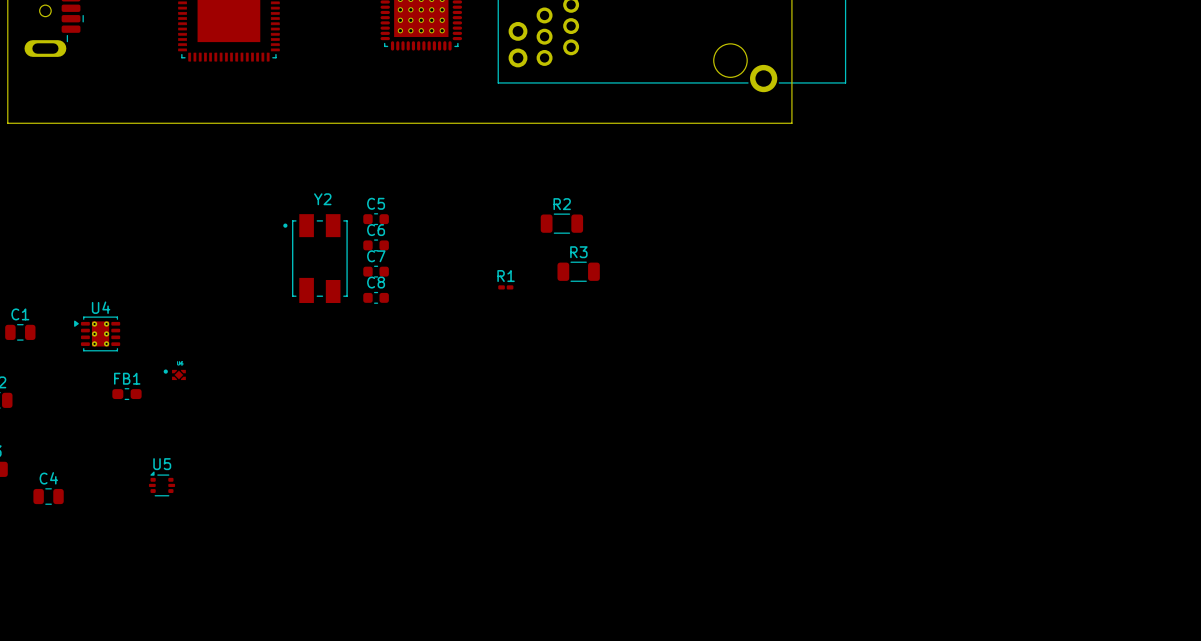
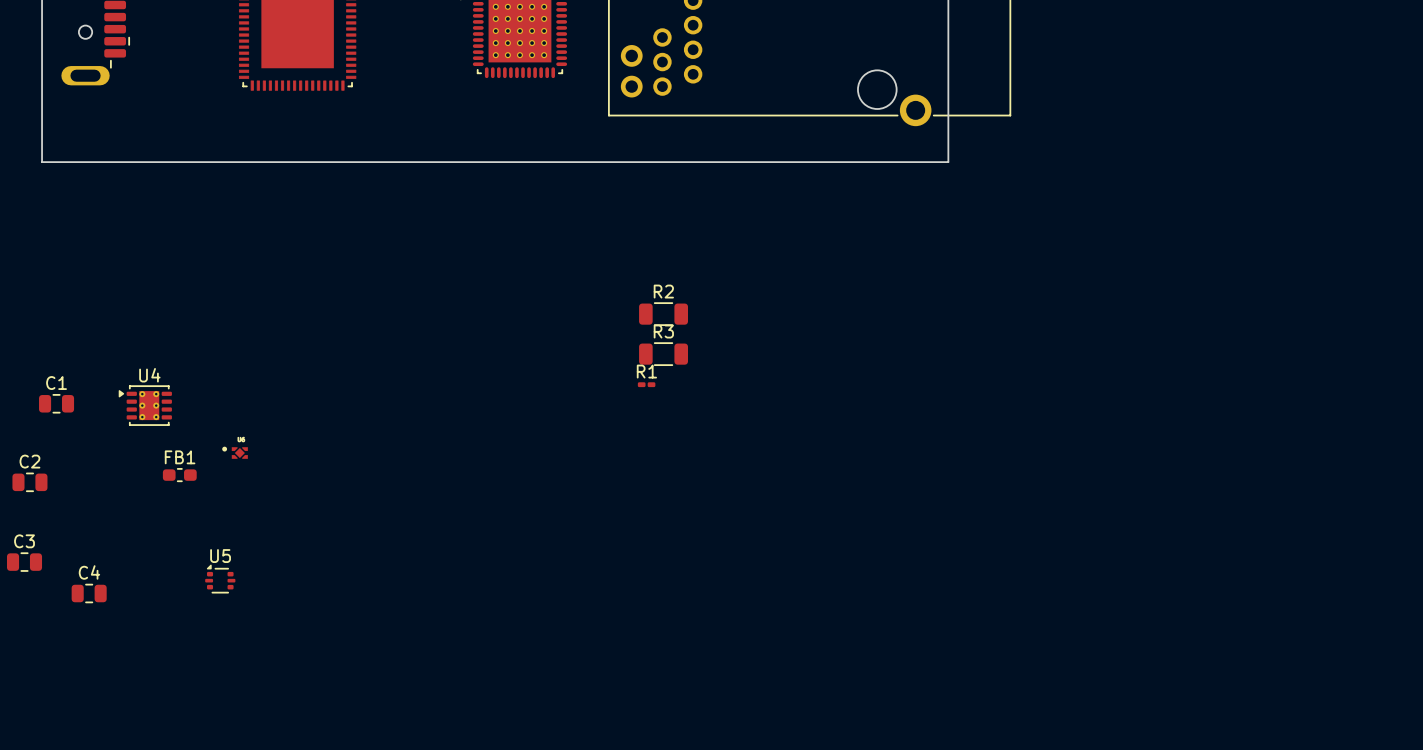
C5: (376, 219) -> none
R2 position: (561, 223) -> (663, 314)
C6: (376, 245) -> none
Y2: (315, 258) -> none
C7: (376, 271) -> none
R3 position: (578, 271) -> (663, 354)
R1 position: (505, 287) -> (646, 384)
C8: (376, 297) -> none

